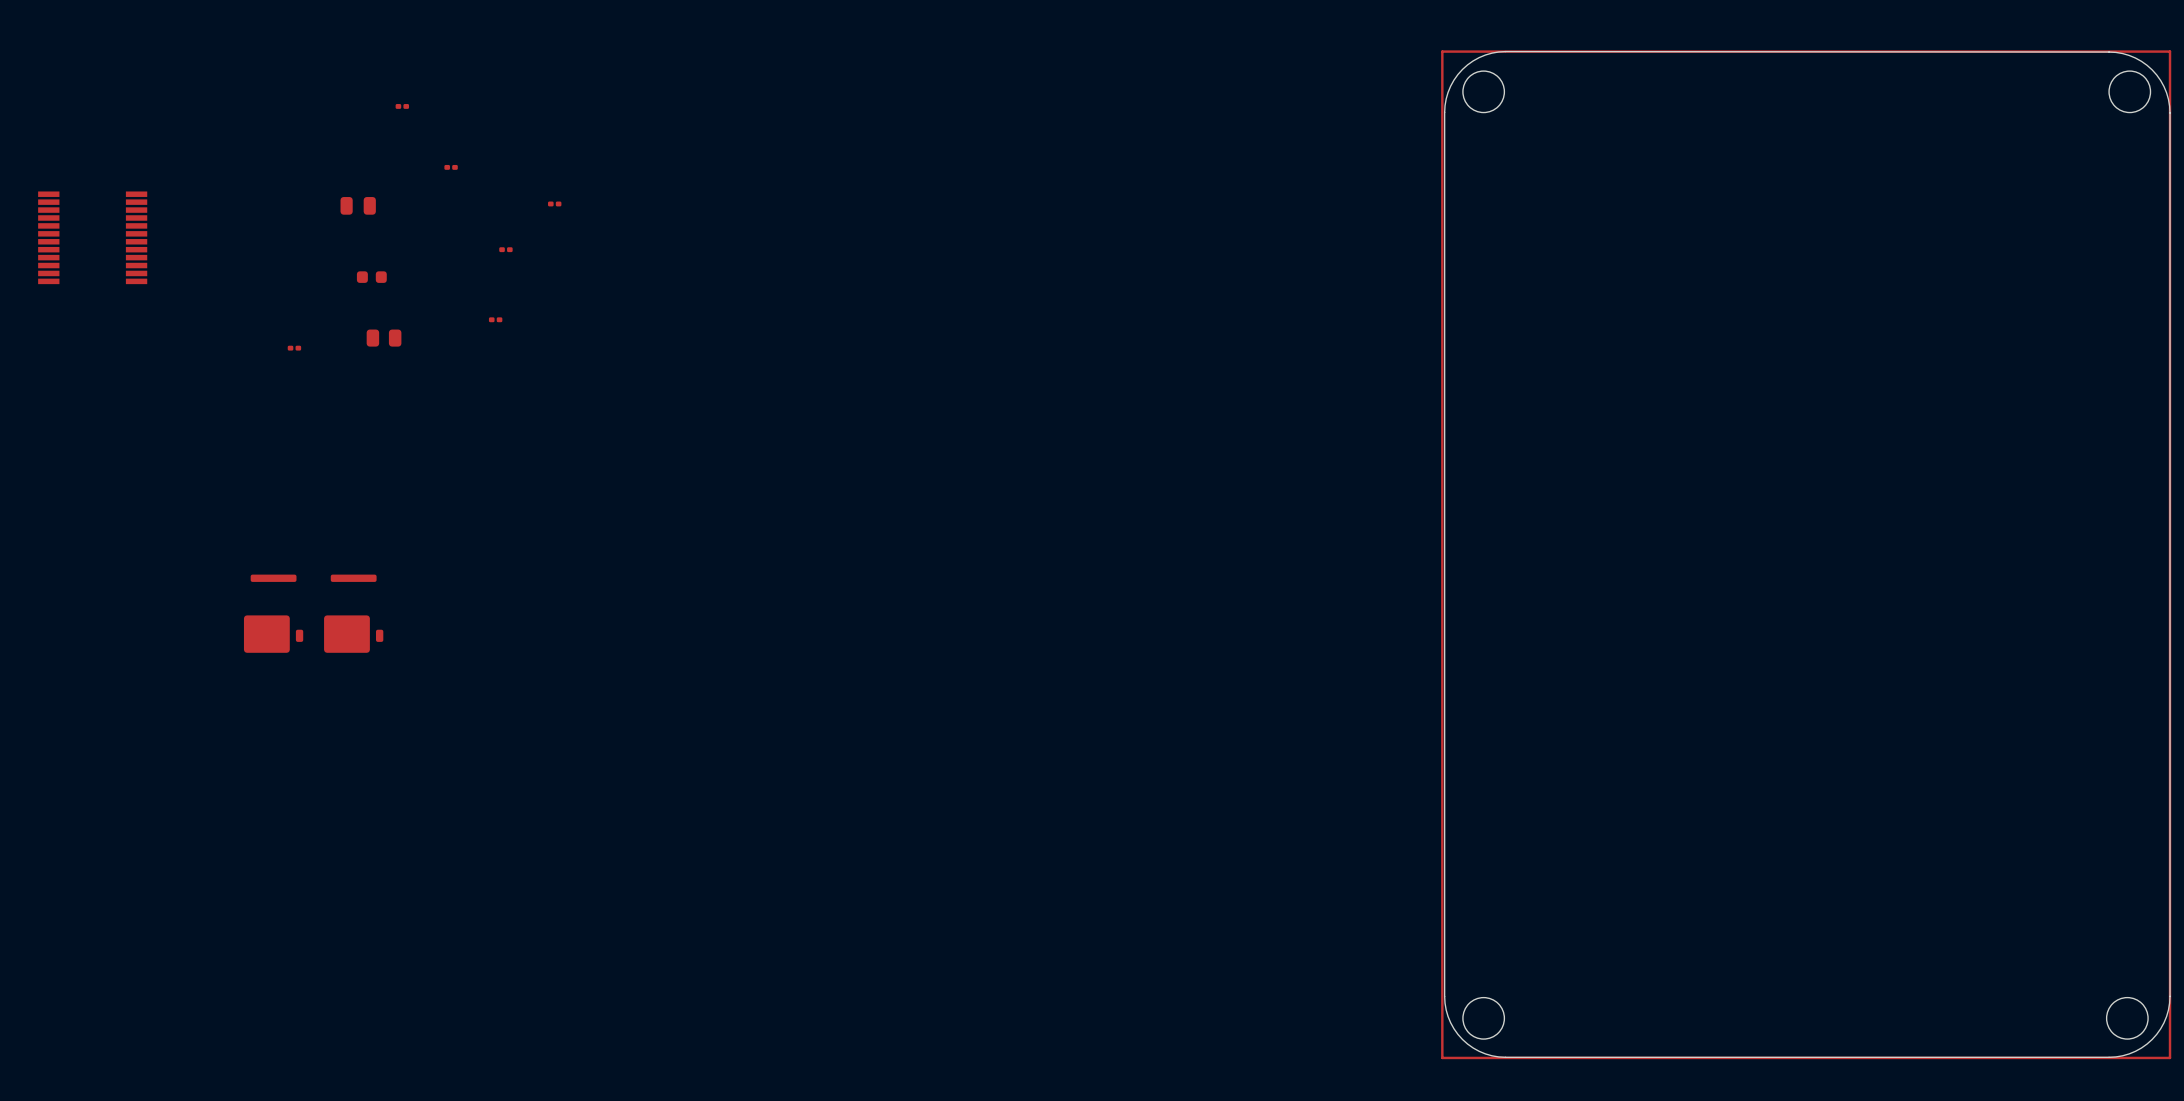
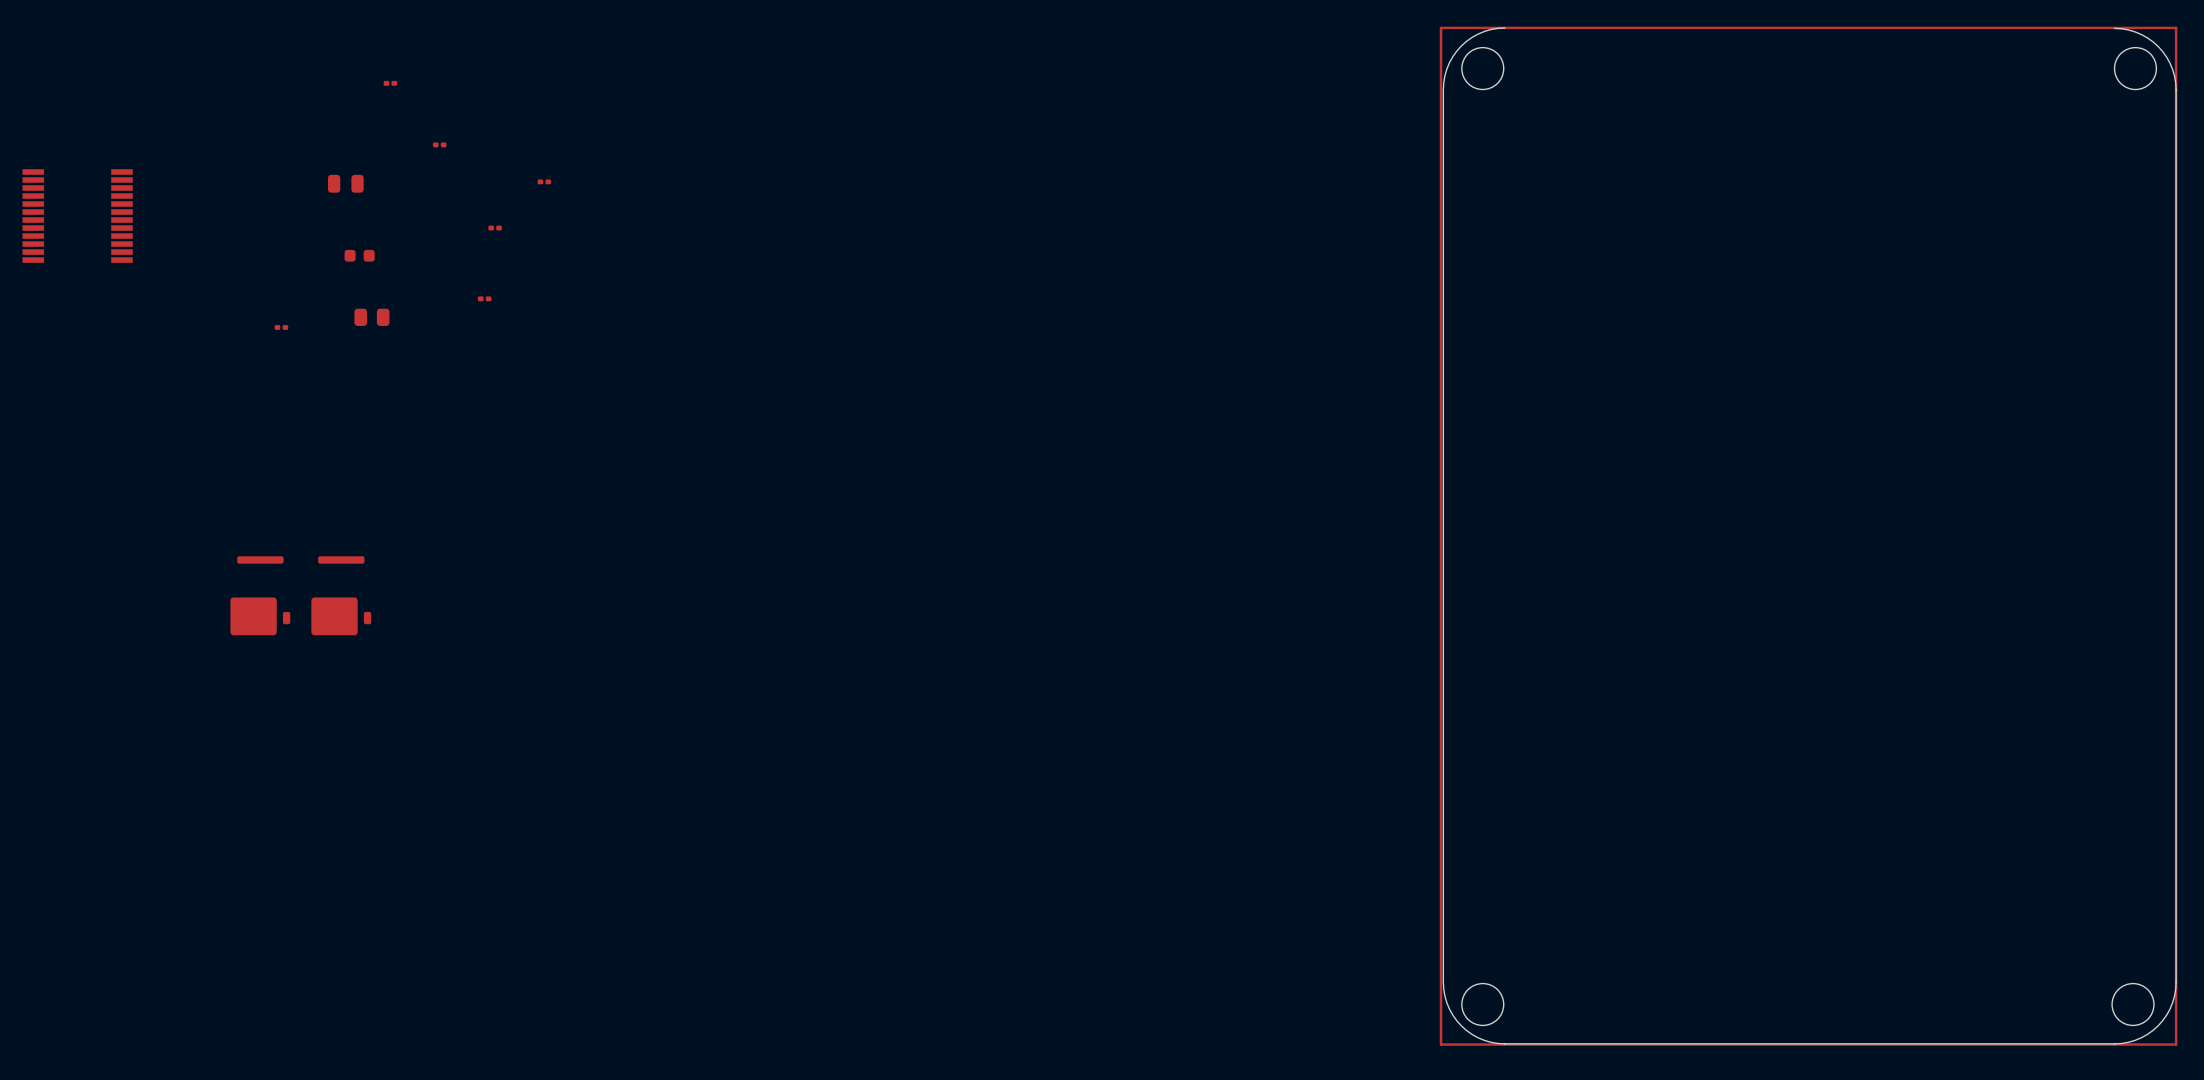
board edge: (1505, 51) (2109, 52) -> none

